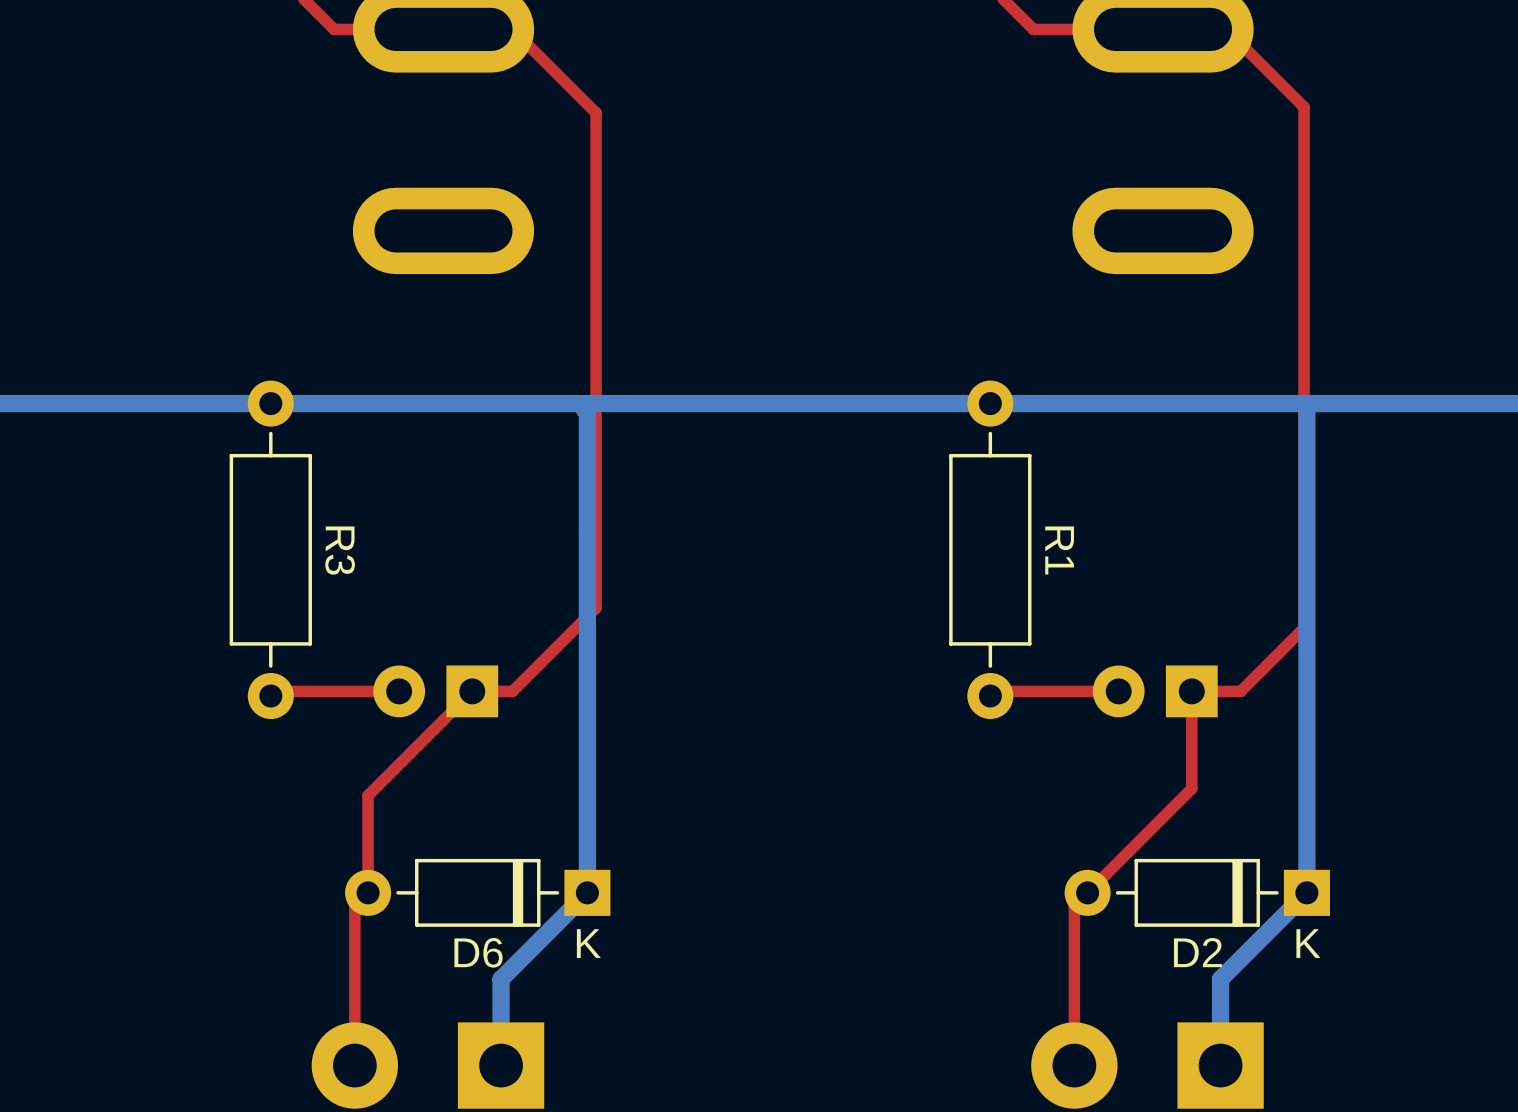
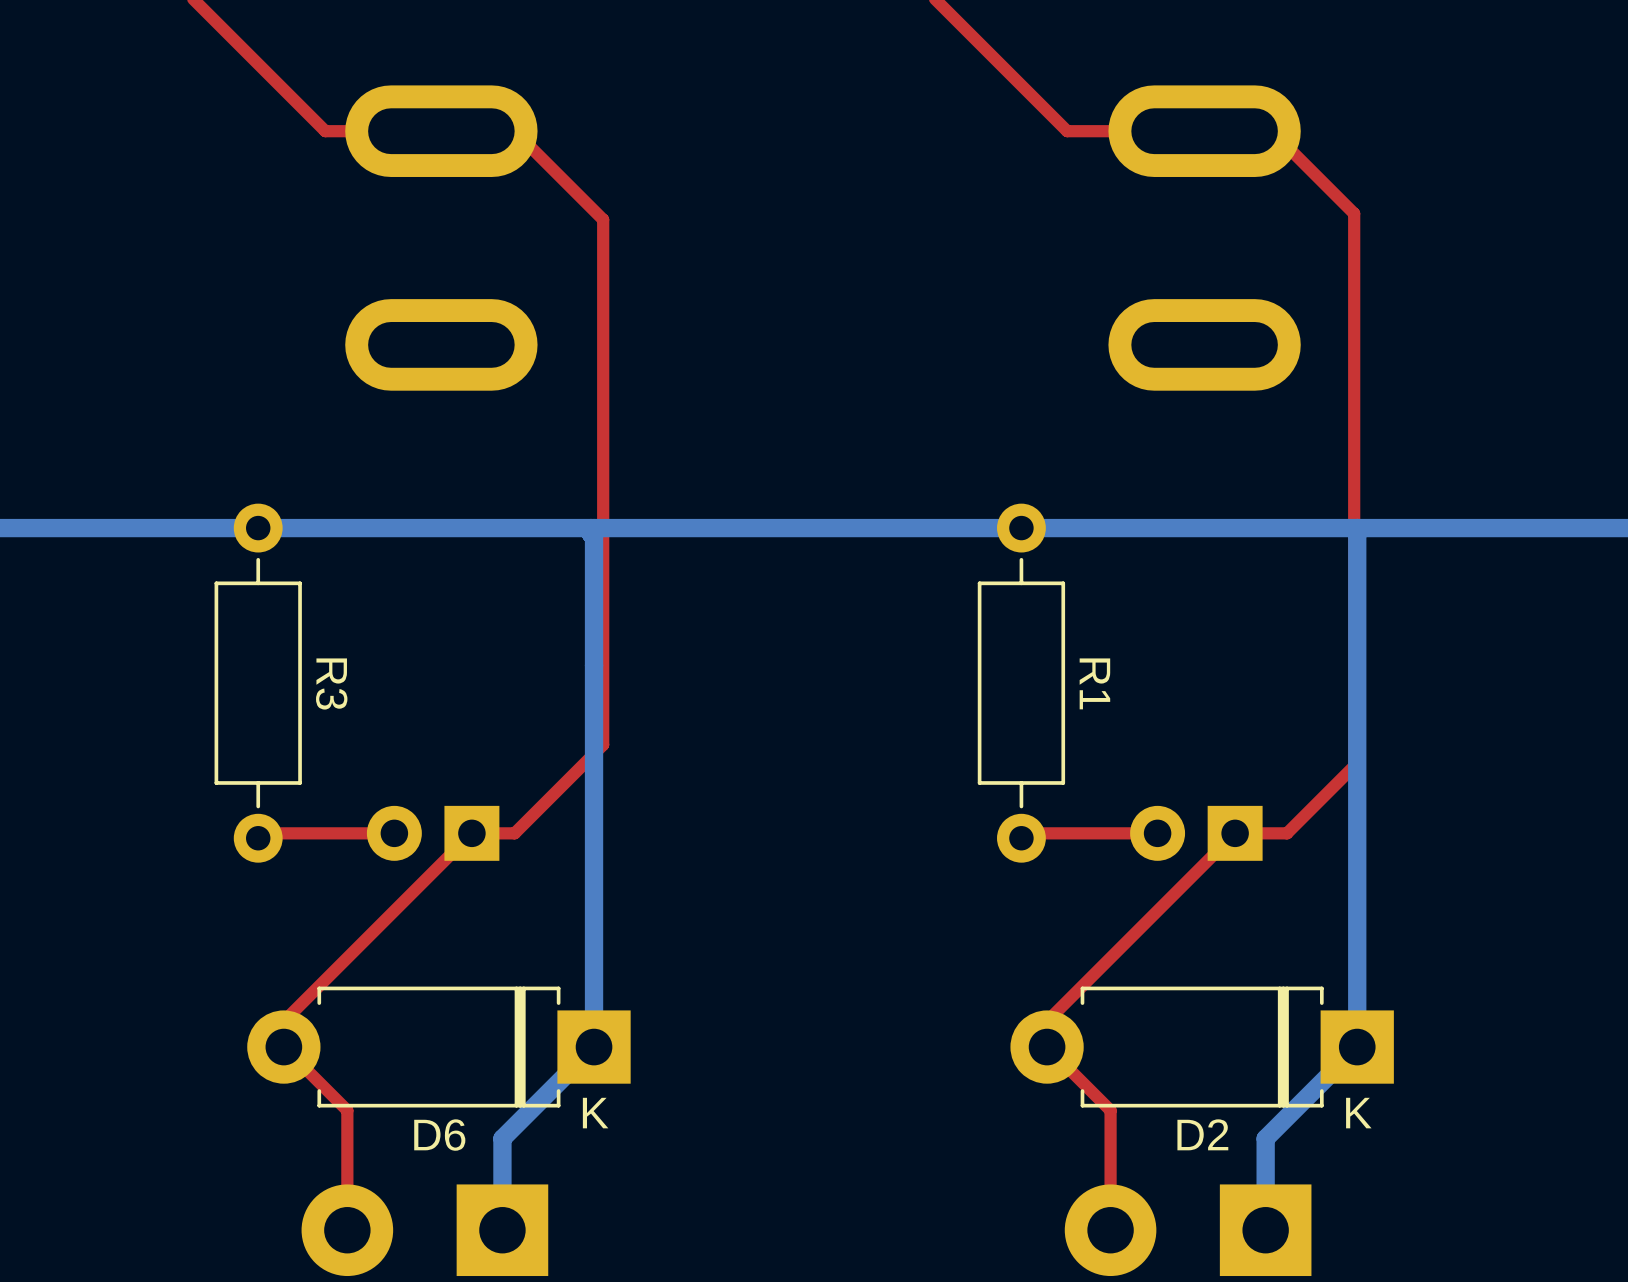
top track: (1191, 691) (1191, 788) (1074, 906) (1074, 952) -> (1235, 833) (1047, 1021) (1047, 1047) (1110, 1110)
top track: (368, 795) (368, 892) (354, 906) (354, 952) -> (361, 943) (283, 1021) (283, 1047) (347, 1110)
D6 footprint: [345, 858, 611, 927] -> [247, 986, 631, 1108]
D2 footprint: [1064, 858, 1330, 927] -> [1010, 986, 1394, 1108]

